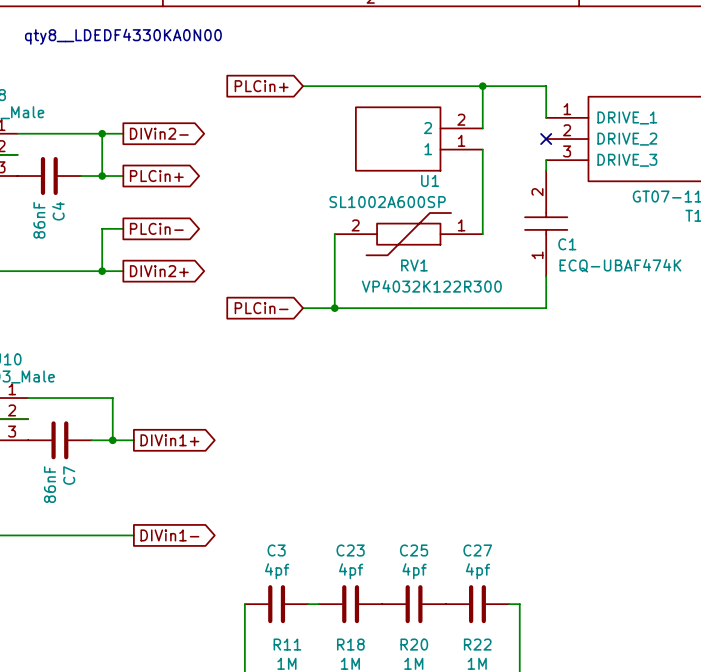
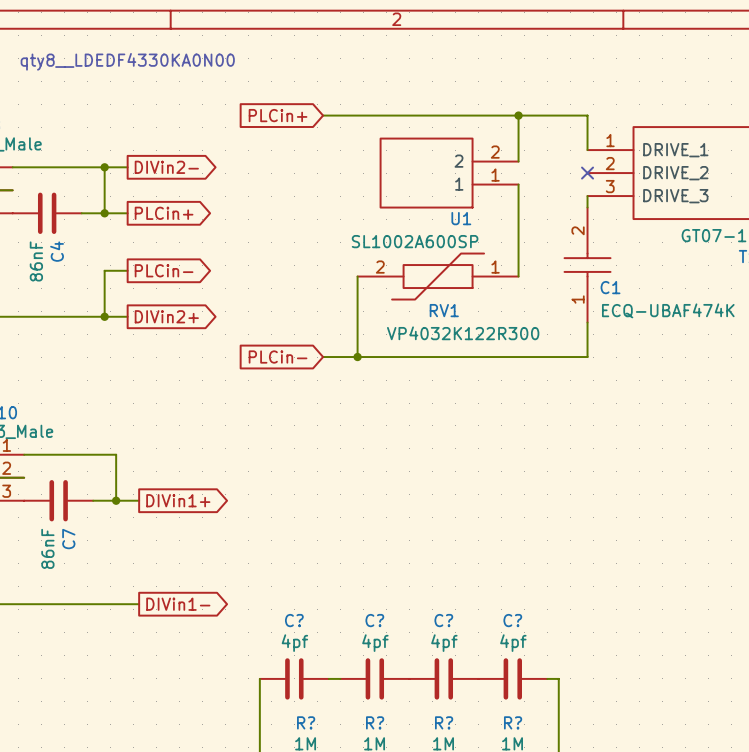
C3 name: C3 (276, 550) -> C? (294, 620)
C23 name: C23 (350, 550) -> C? (374, 620)
C25 name: C25 (414, 550) -> C? (443, 620)
C27 name: C27 (477, 550) -> C? (512, 620)
R11 name: R11 (287, 644) -> R? (306, 722)
R18 name: R18 (350, 644) -> R? (375, 722)
R20 name: R20 (414, 644) -> R? (444, 722)
R22 name: R22 (477, 644) -> R? (513, 722)

